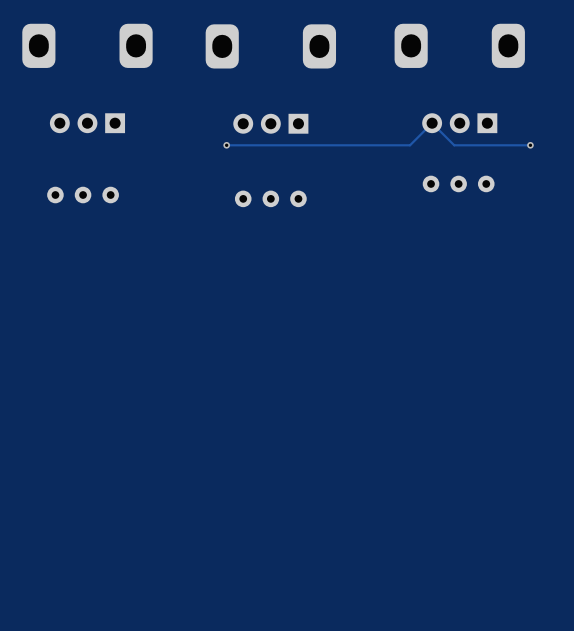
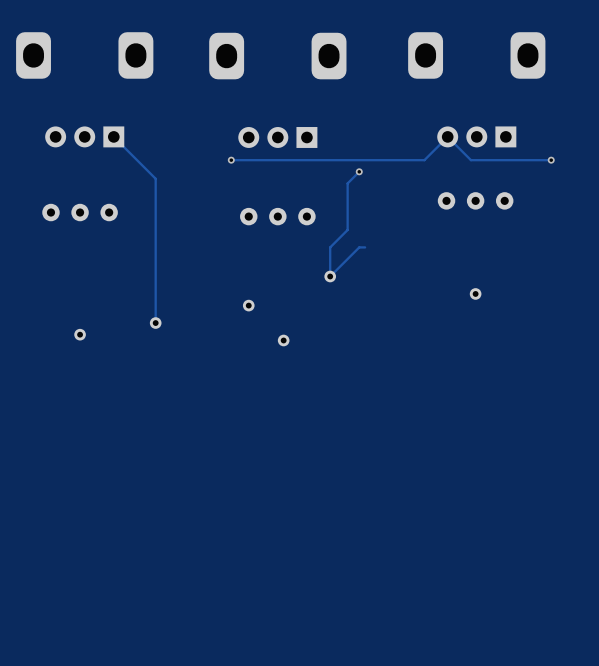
track: none -> (113, 136) (155, 178) (155, 323)
track: none -> (359, 171) (347, 183) (347, 229) (330, 247) (330, 276) (359, 247) (365, 247)
via: none -> (359, 171)
part: none -> (330, 276)
part: none -> (475, 293)
part: none -> (248, 305)
part: none -> (155, 323)
part: none -> (80, 334)
part: none -> (283, 340)

